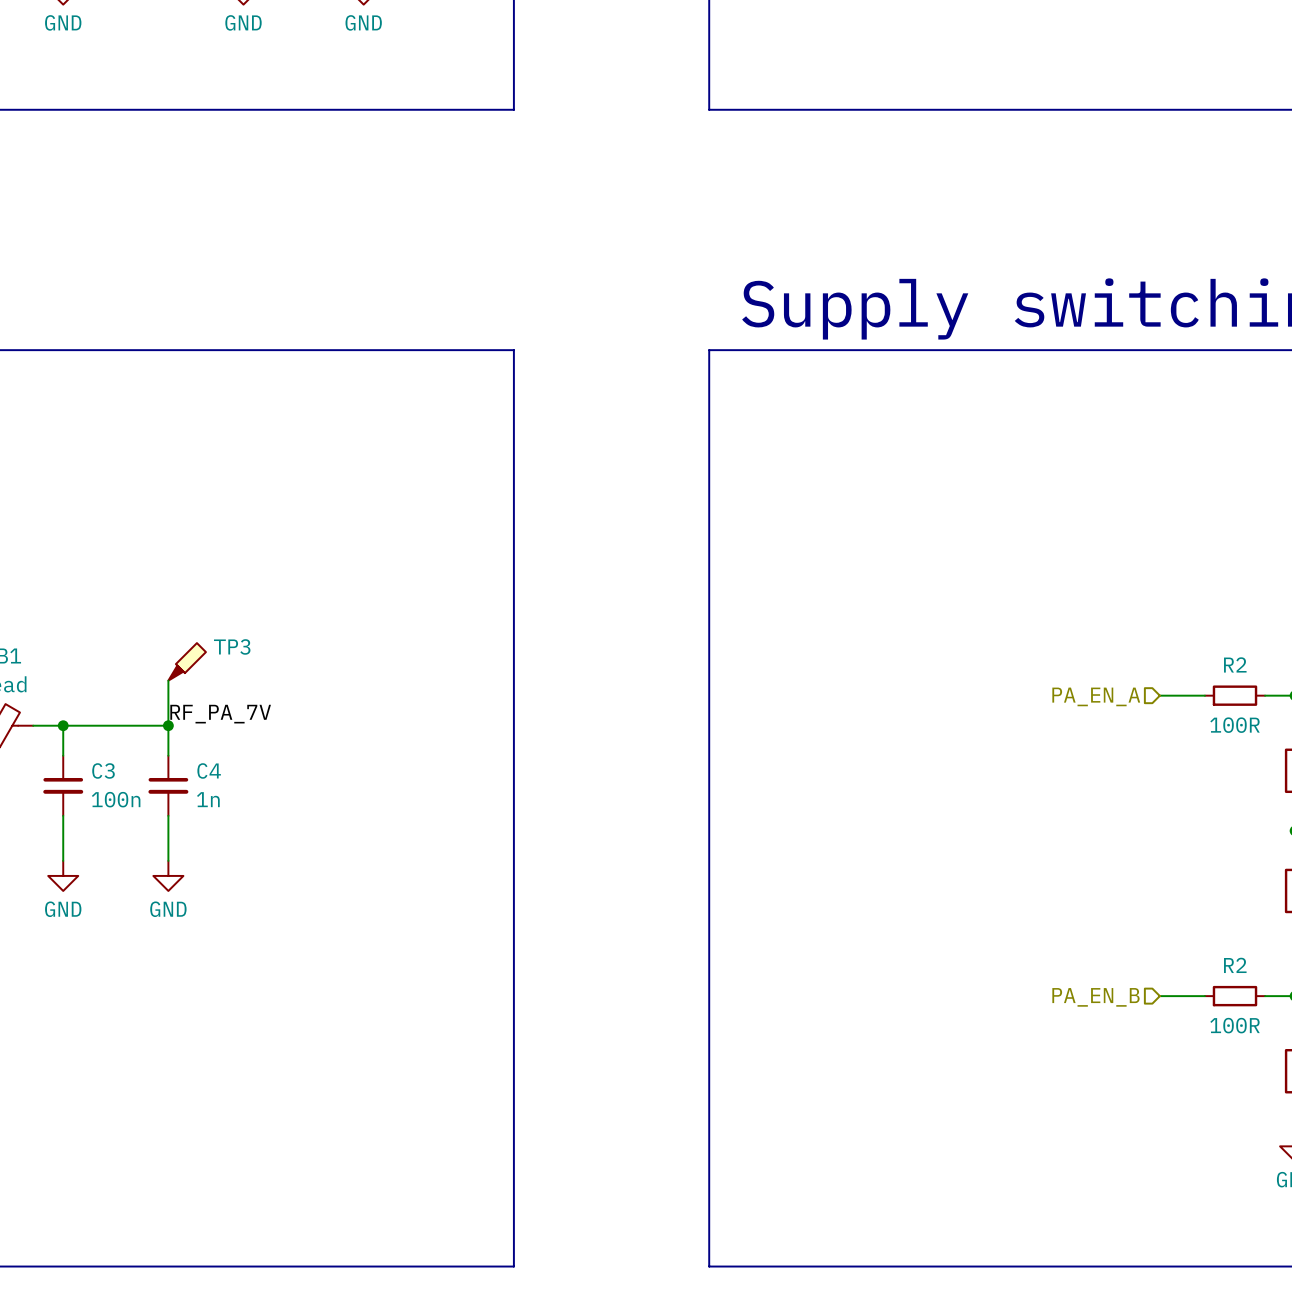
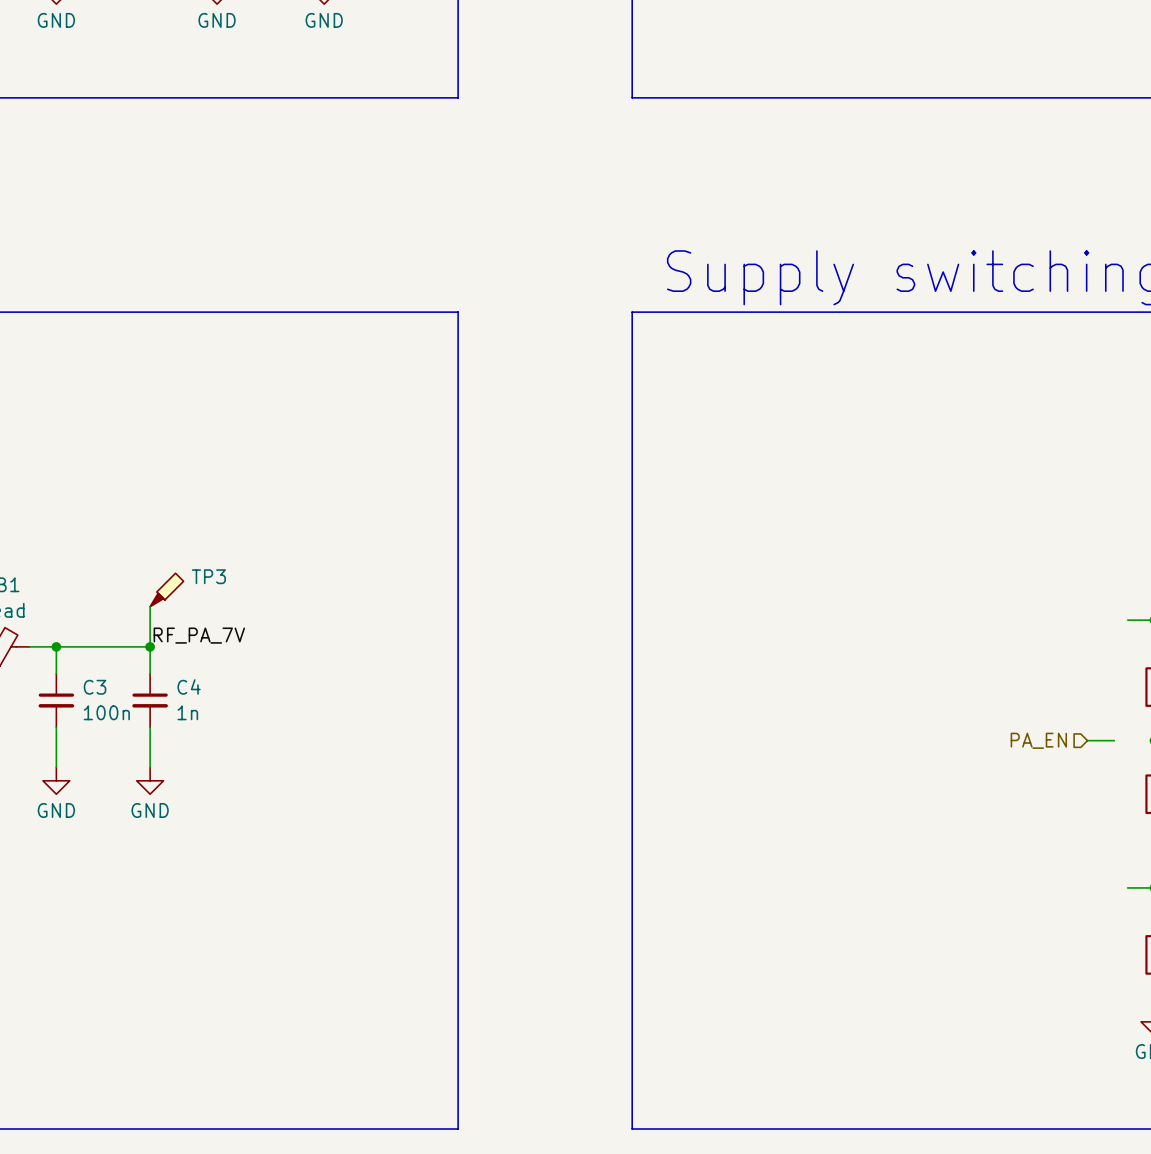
wire: (1159, 695) (1204, 695) -> none
R2: 100R (1235, 695) -> none
hierarchical label: PA_EN_A (1096, 696) -> none
wire: none -> (1087, 740) (1114, 740)
hierarchical label: none -> PA_EN (1038, 740)
wire: (1159, 996) (1204, 996) -> none
R2: 100R (1235, 996) -> none
hierarchical label: PA_EN_B (1095, 997) -> none

